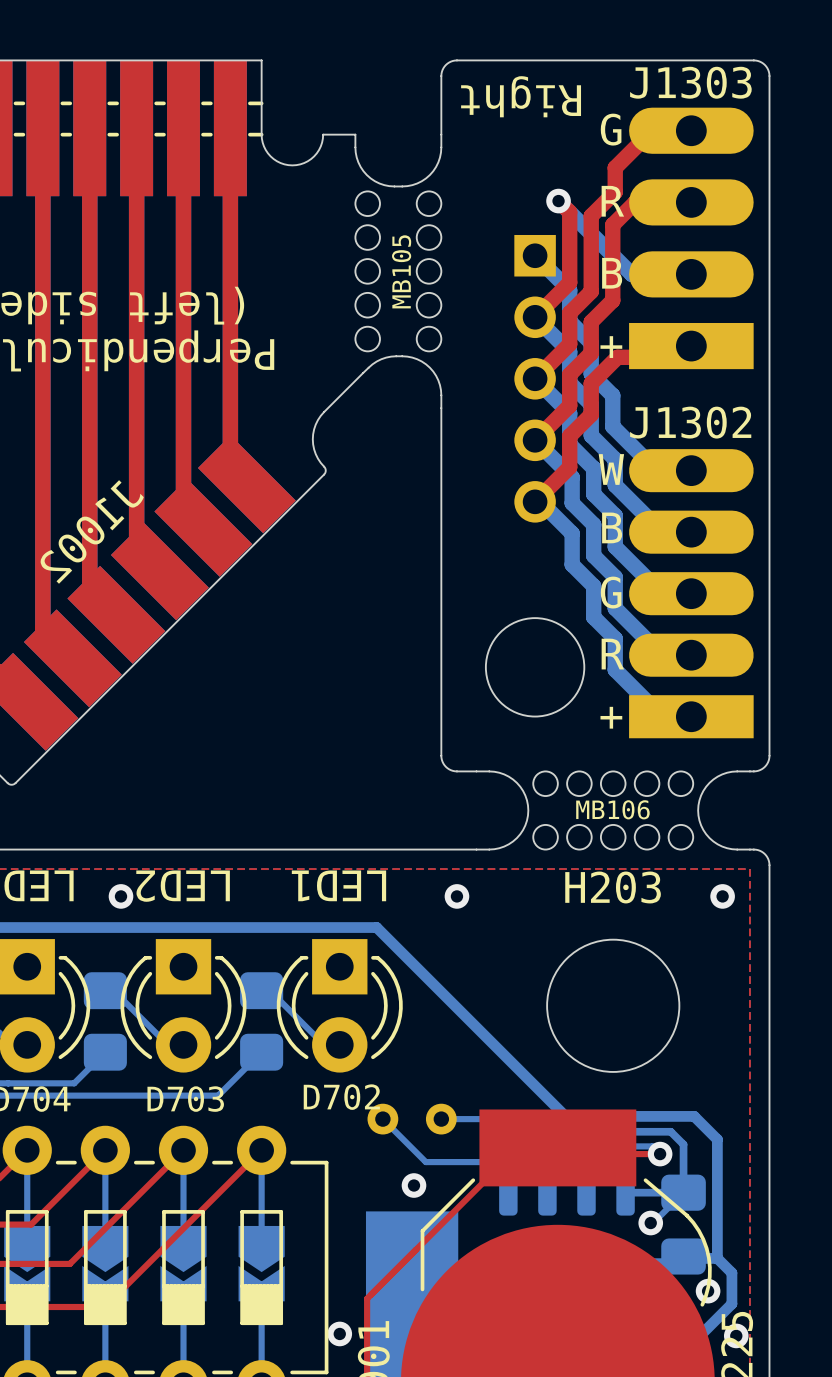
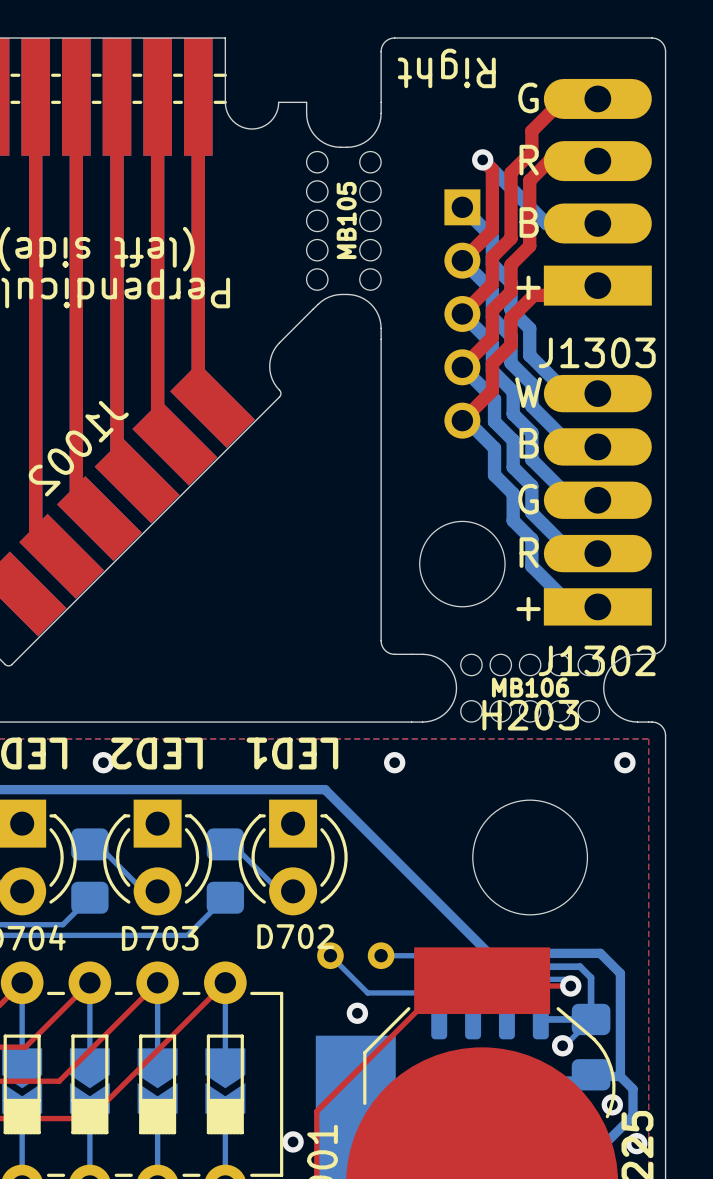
J1303 name position: J1303 (690, 82) -> J1303 (597, 352)
J1302 name position: J1302 (690, 422) -> J1302 (597, 660)
H203 name position: H203 (613, 887) -> H203 (530, 715)

